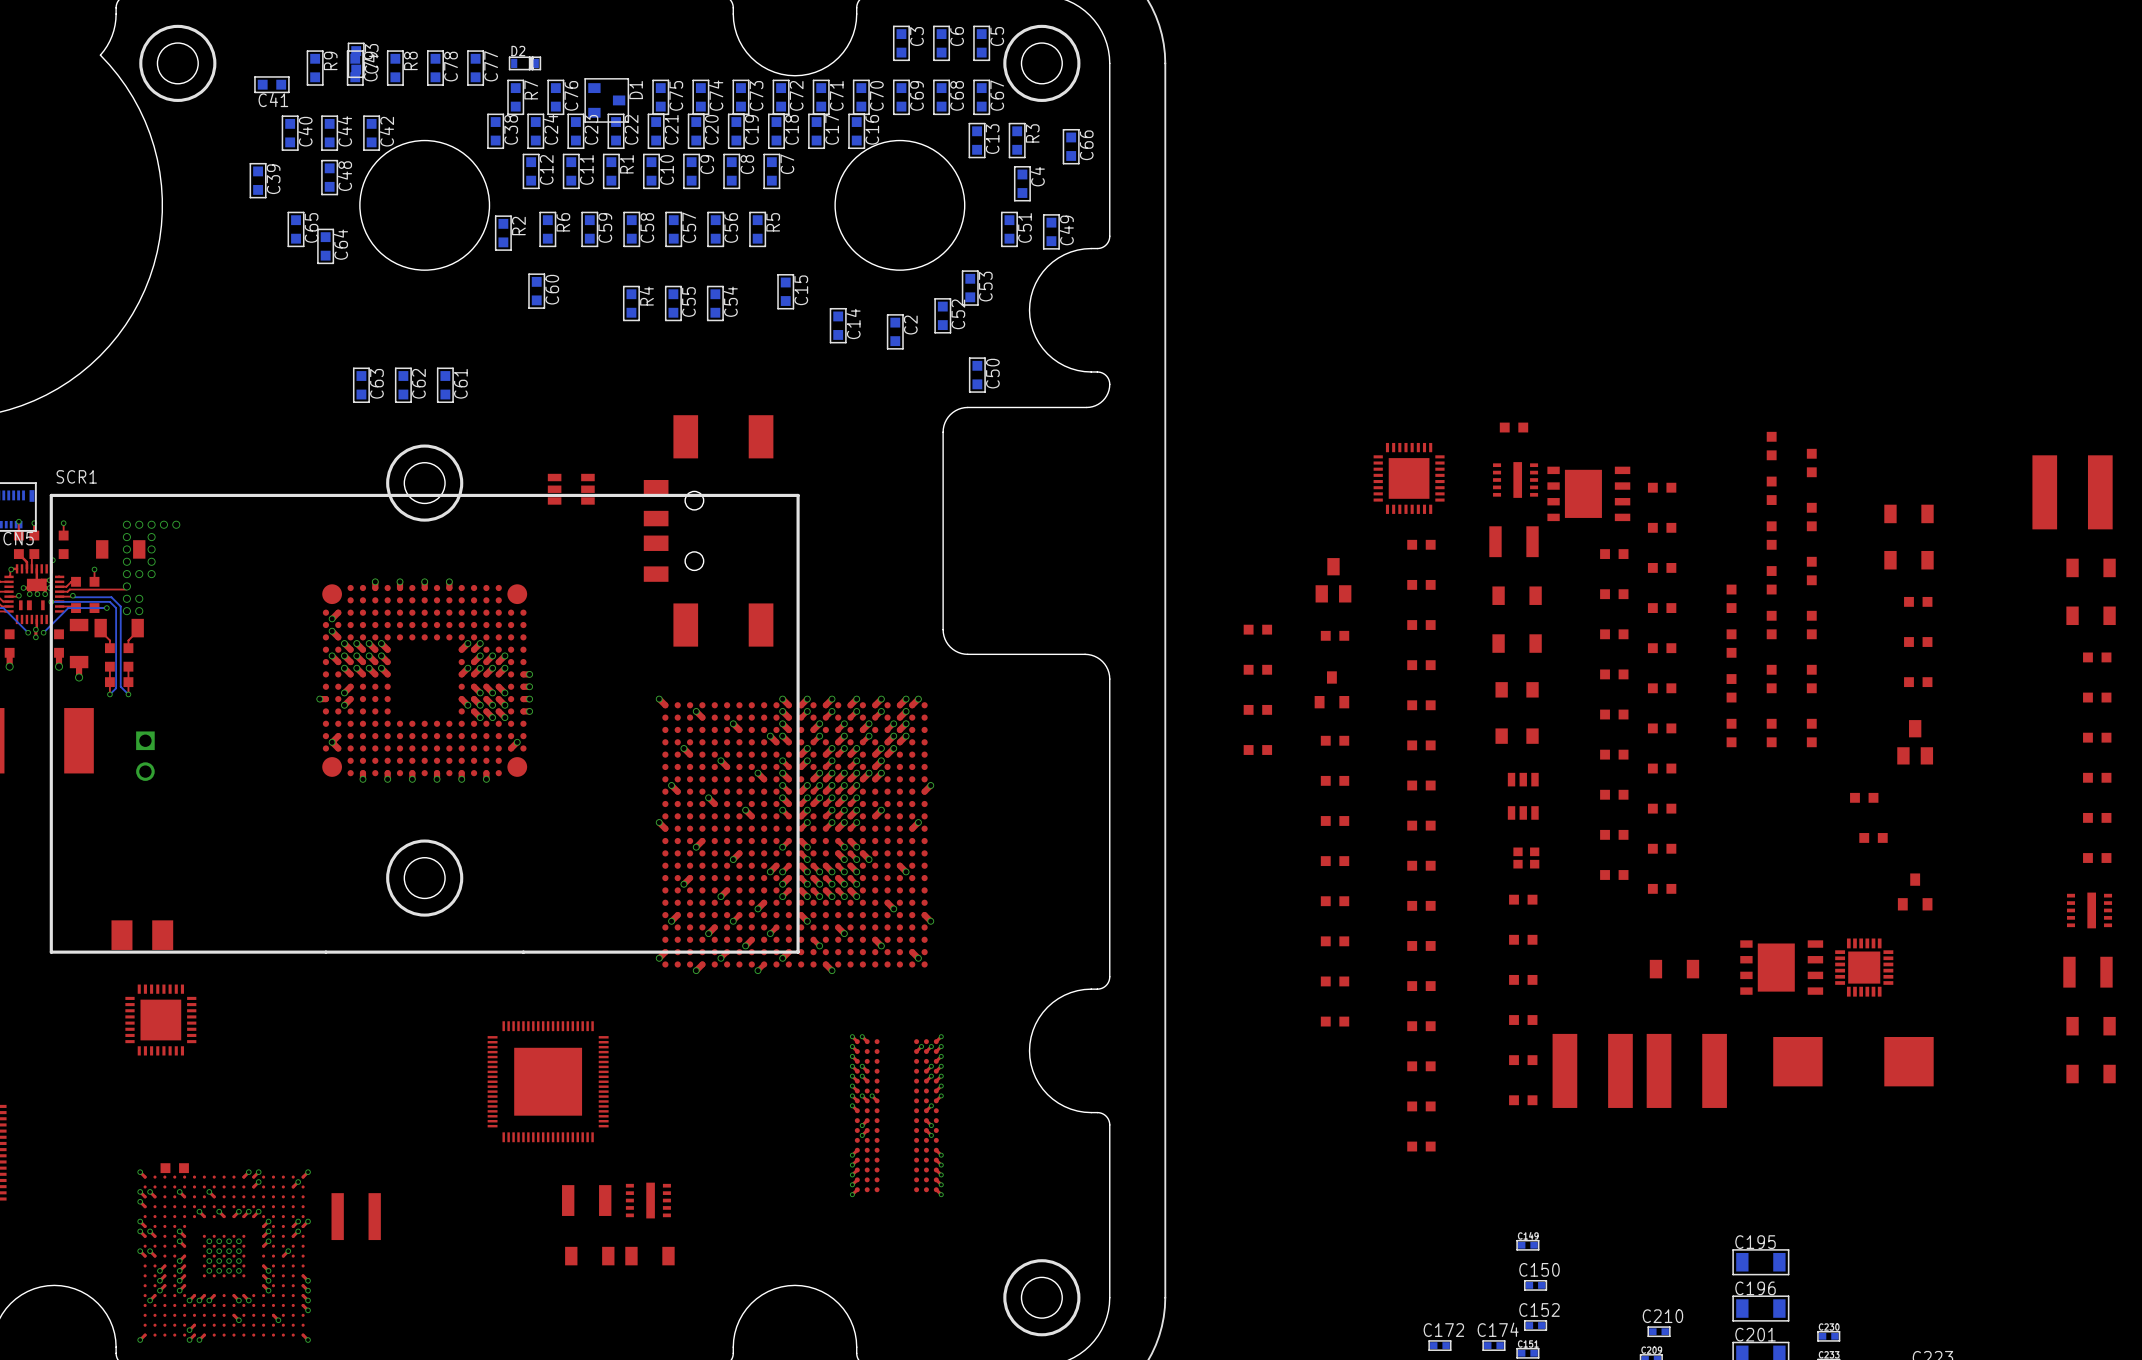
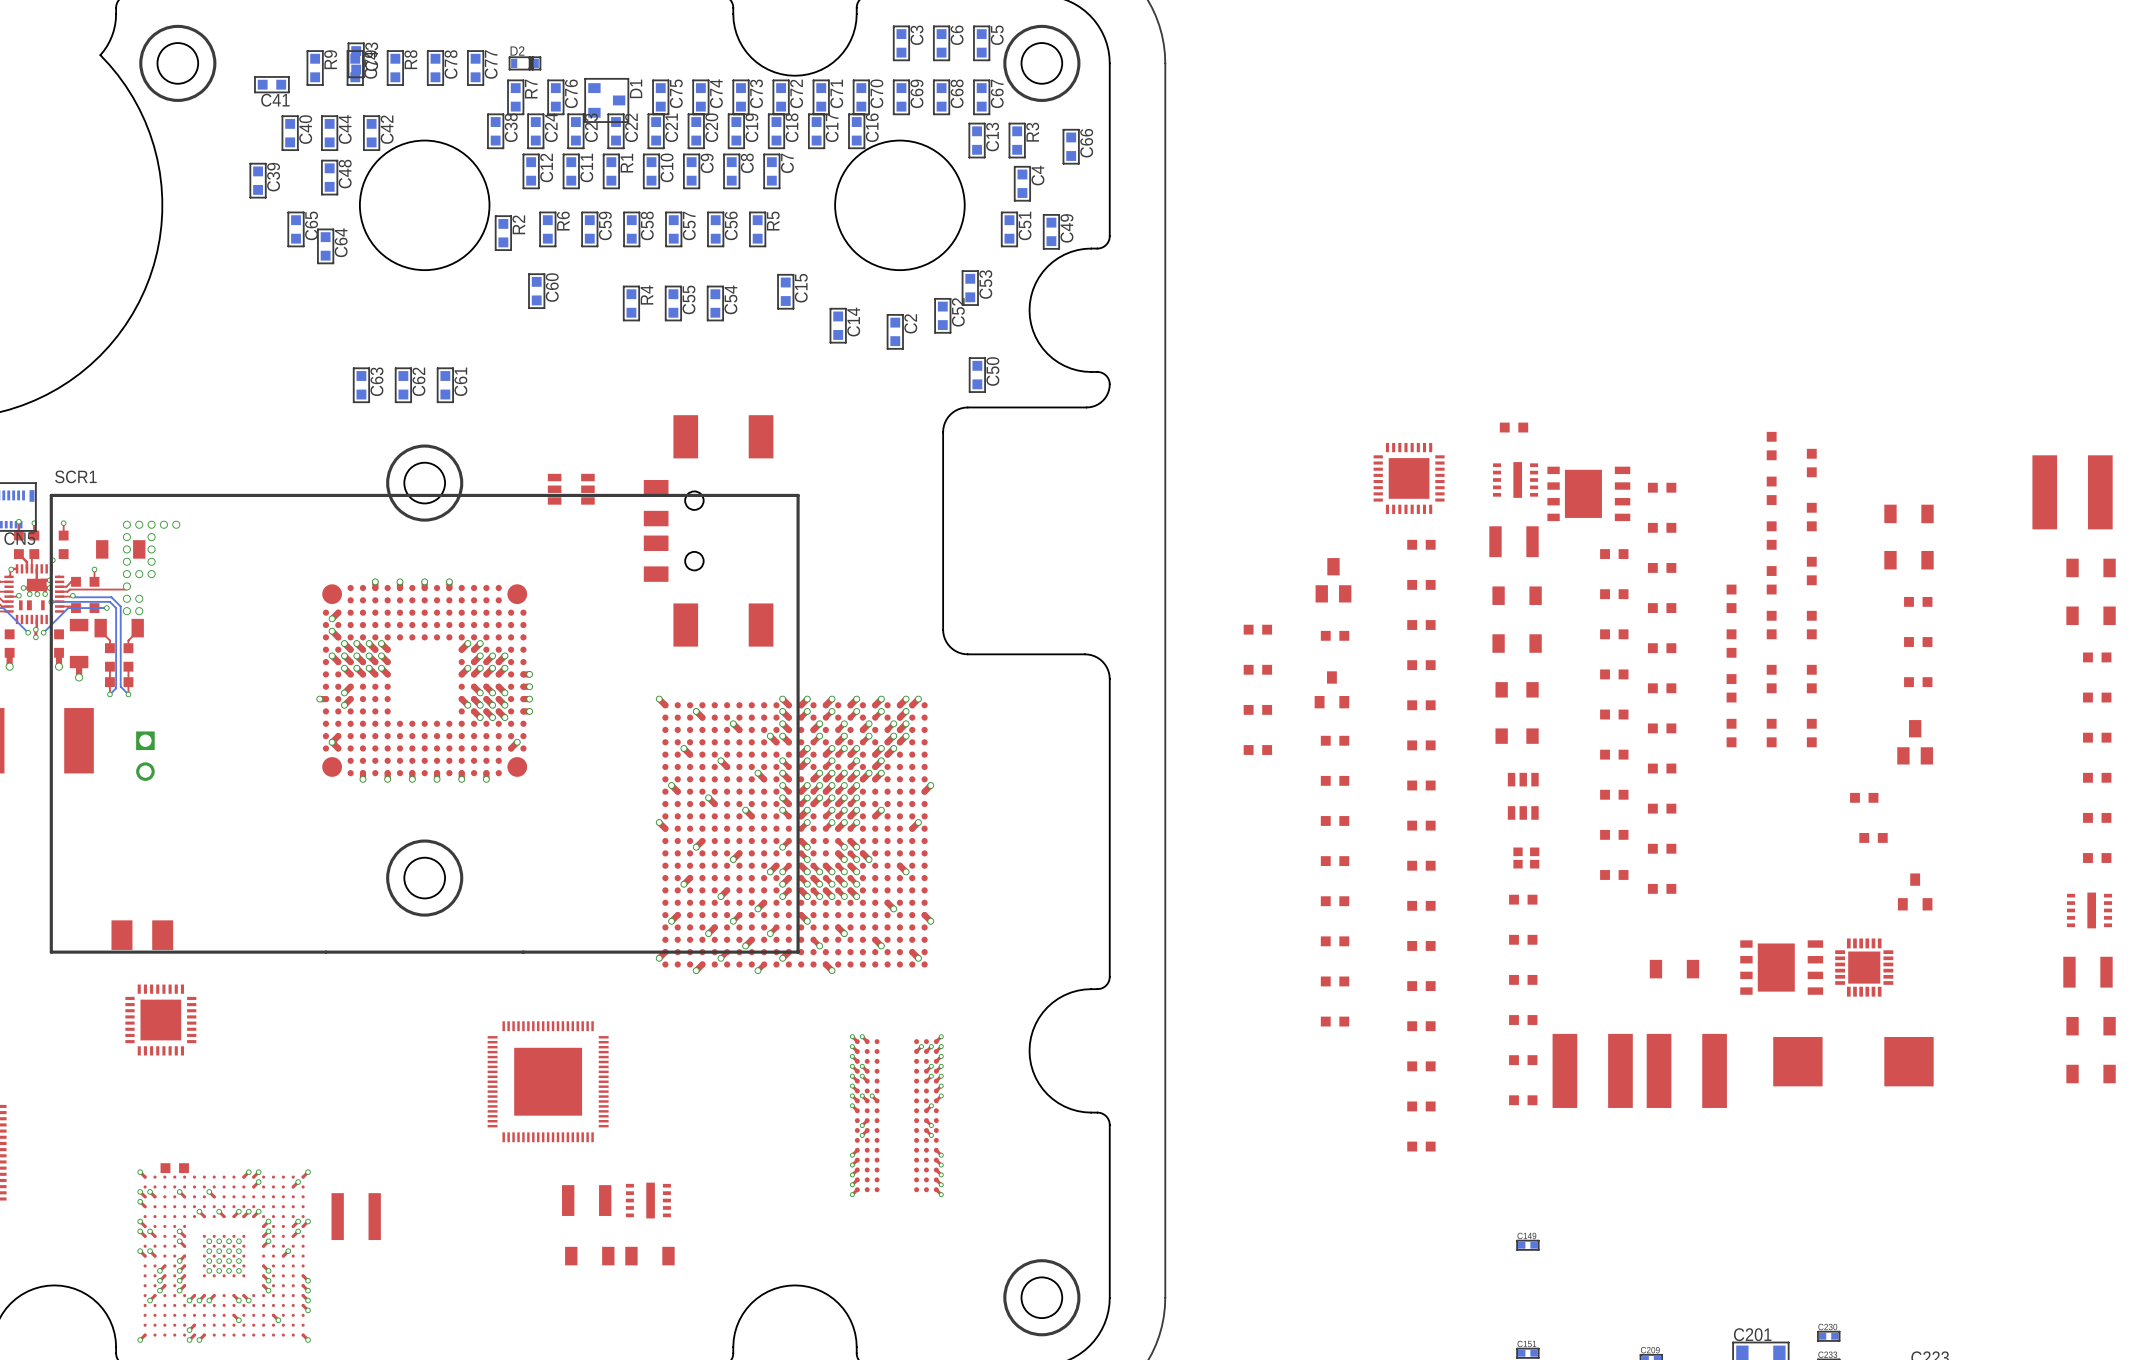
C195: (1760, 1262) -> none
C150: (1535, 1285) -> none
C196: (1760, 1308) -> none
C152: (1535, 1325) -> none
C210: (1659, 1331) -> none
C172: (1439, 1345) -> none
C174: (1493, 1345) -> none

